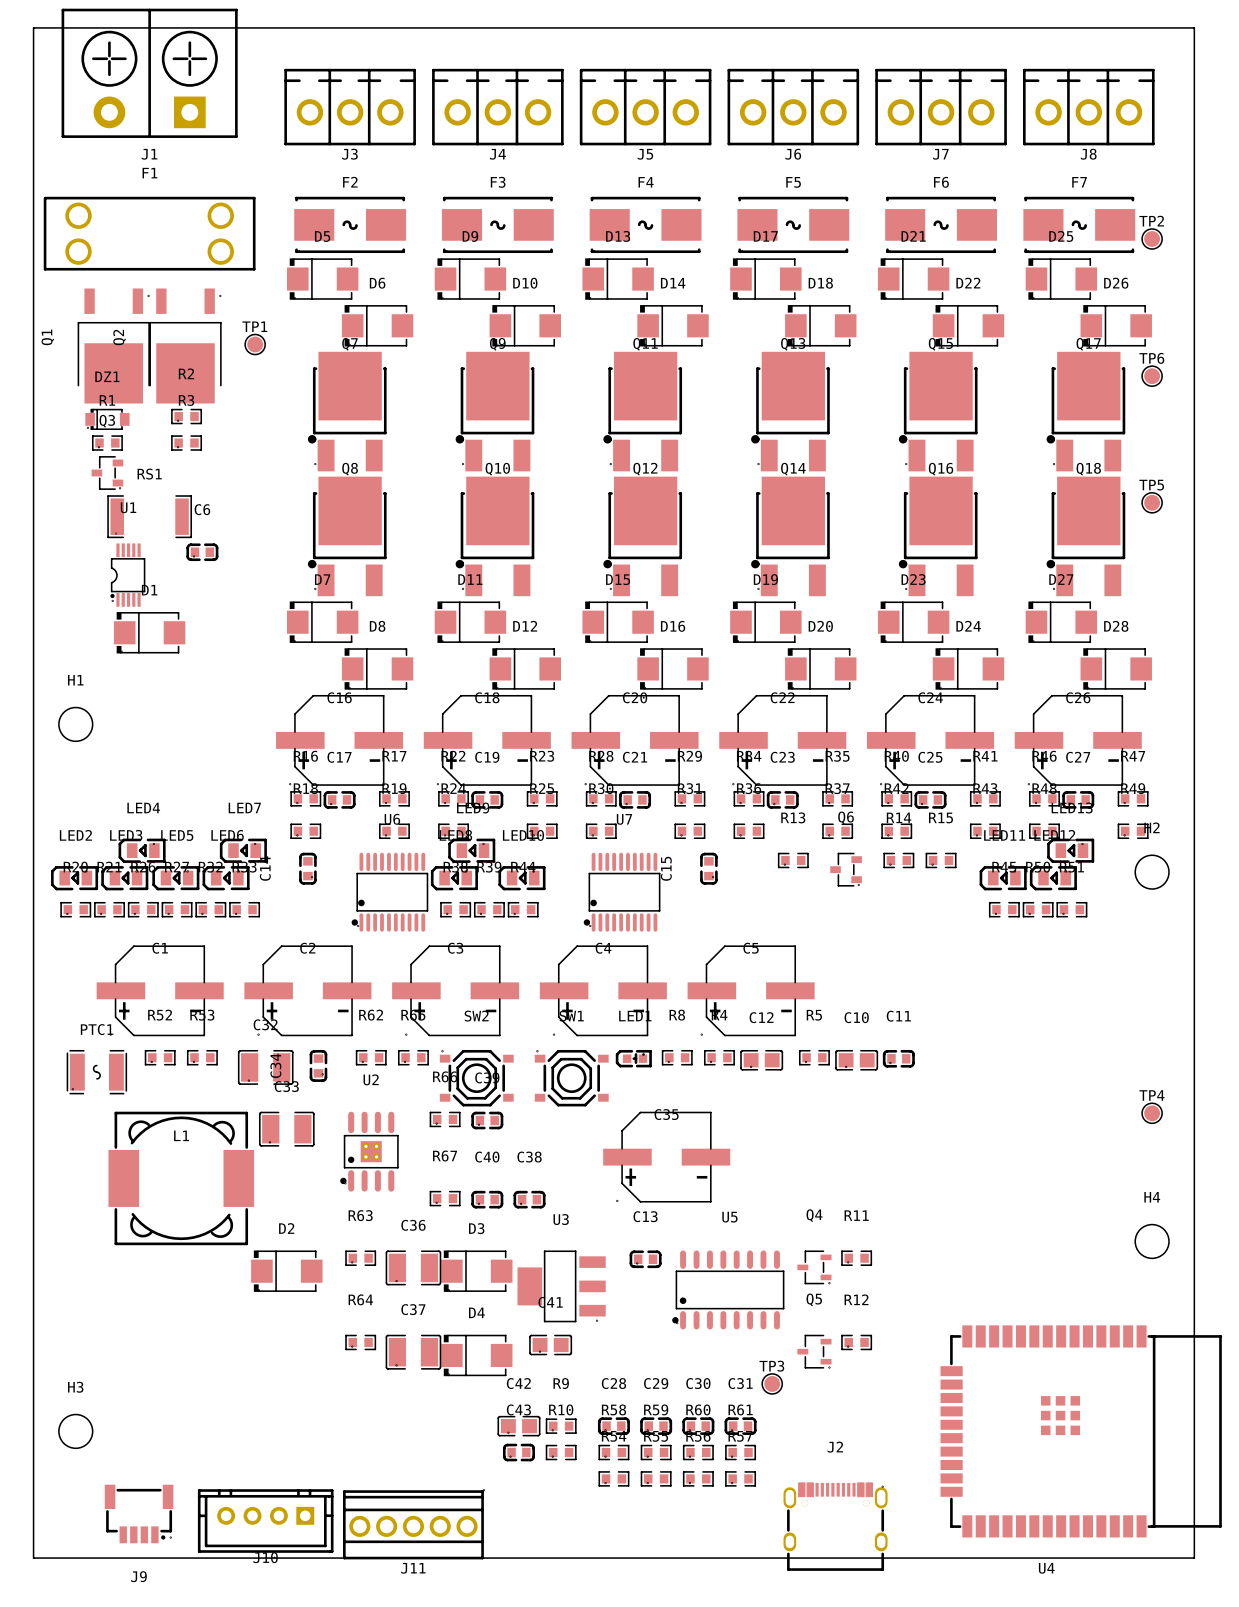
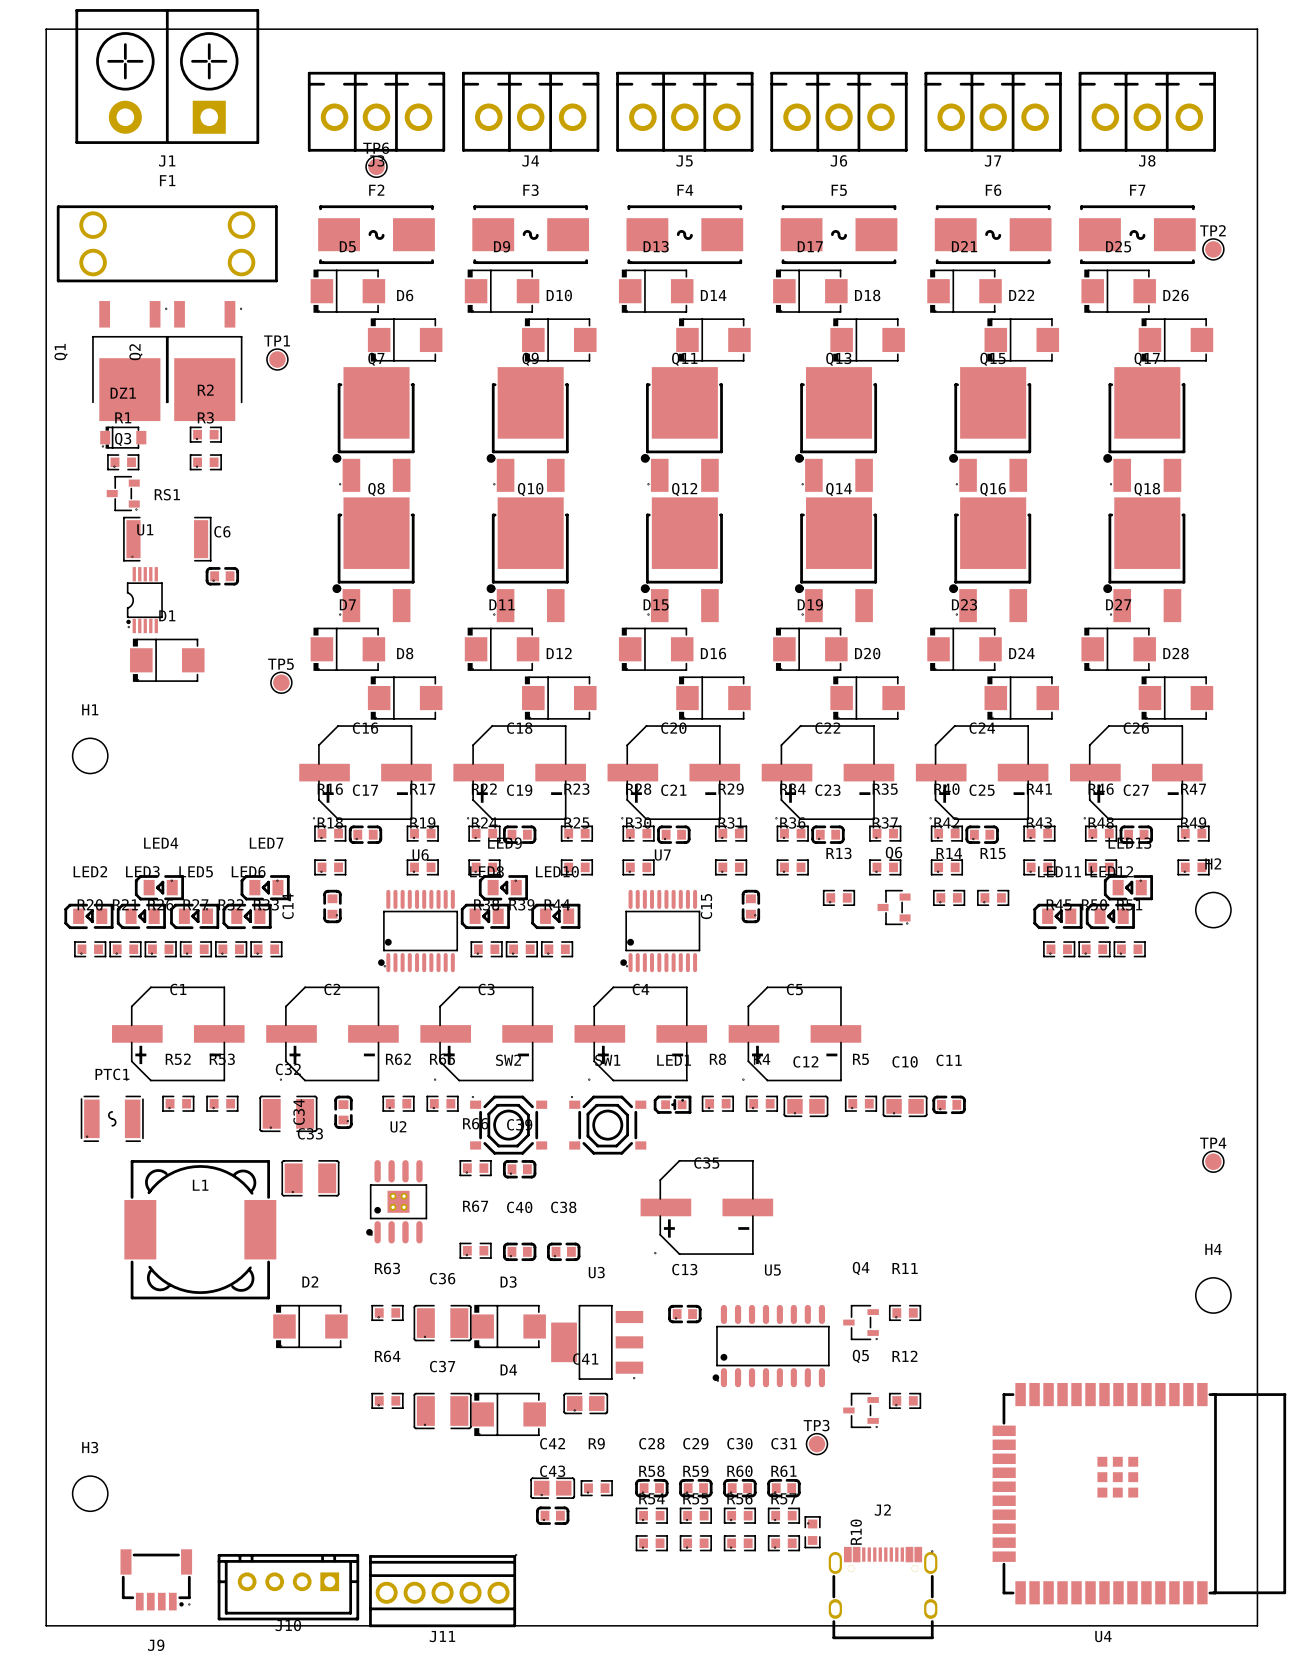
TP6 position: (1152, 376) -> (376, 166)
TP5 position: (1152, 502) -> (281, 682)
R10 rotation: 0° (561, 1452) -> 90° clockwise (812, 1532)
R10 position: (561, 1452) -> (812, 1532)

